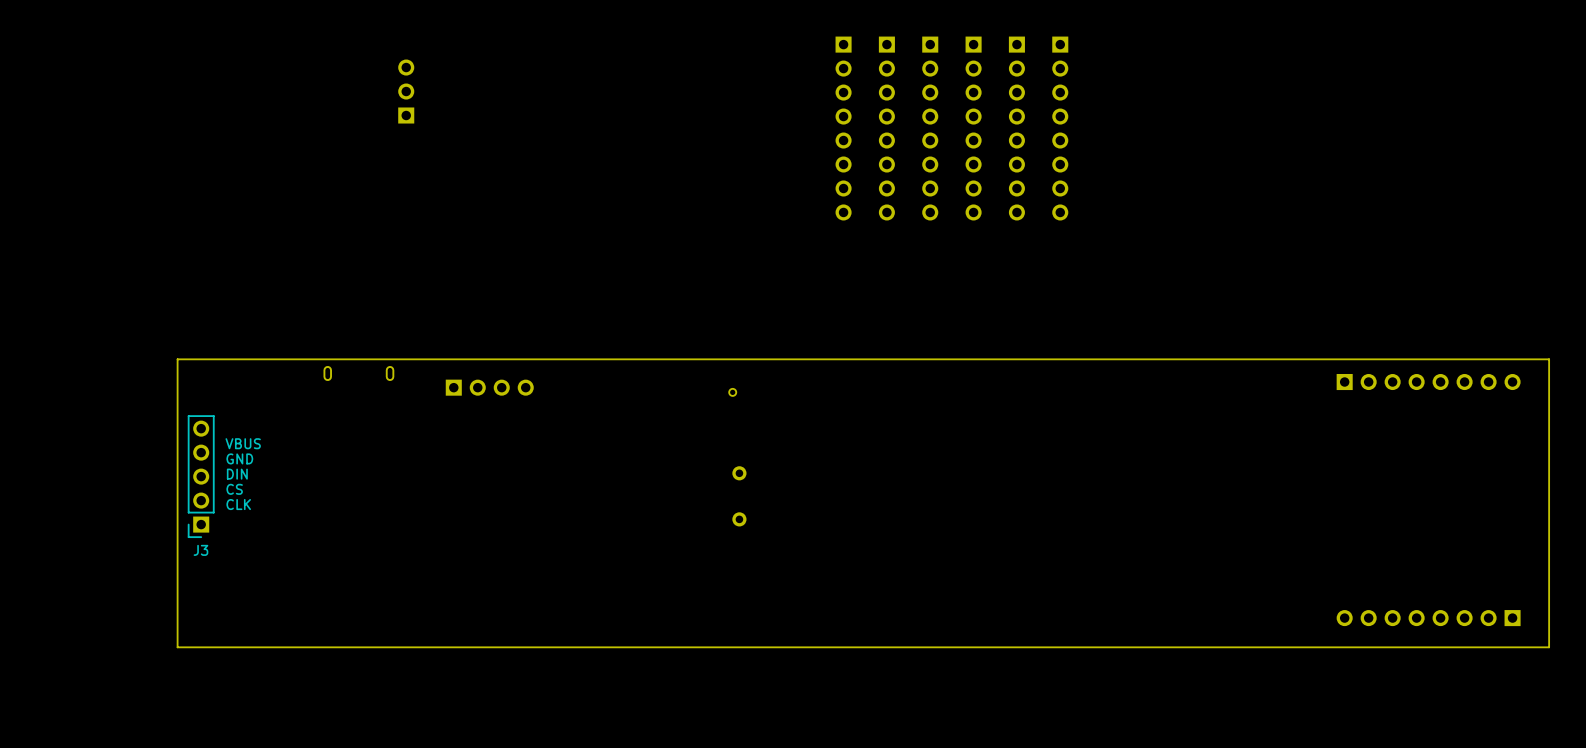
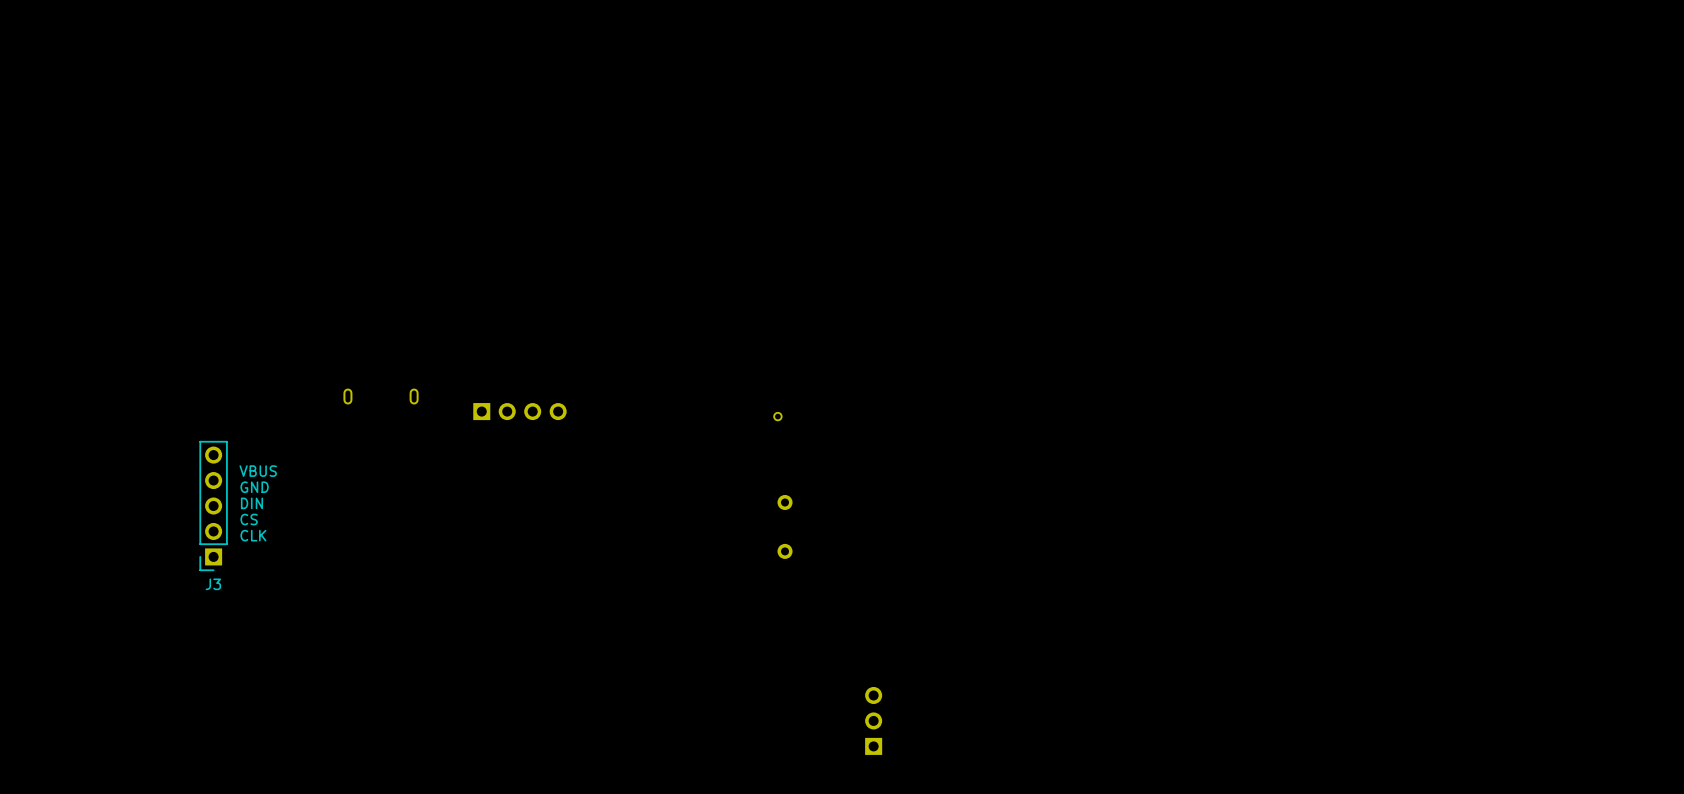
part: (406, 91) -> none
part: (843, 128) -> none
part: (886, 128) -> none
part: (930, 128) -> none
part: (973, 128) -> none
part: (1016, 128) -> none
part: (1060, 128) -> none
board edge: (1549, 359) (177, 359) (177, 647) (1549, 647) (1549, 359) -> none
part: (1428, 382) -> none
part: (1428, 618) -> none
part: none -> (873, 720)

